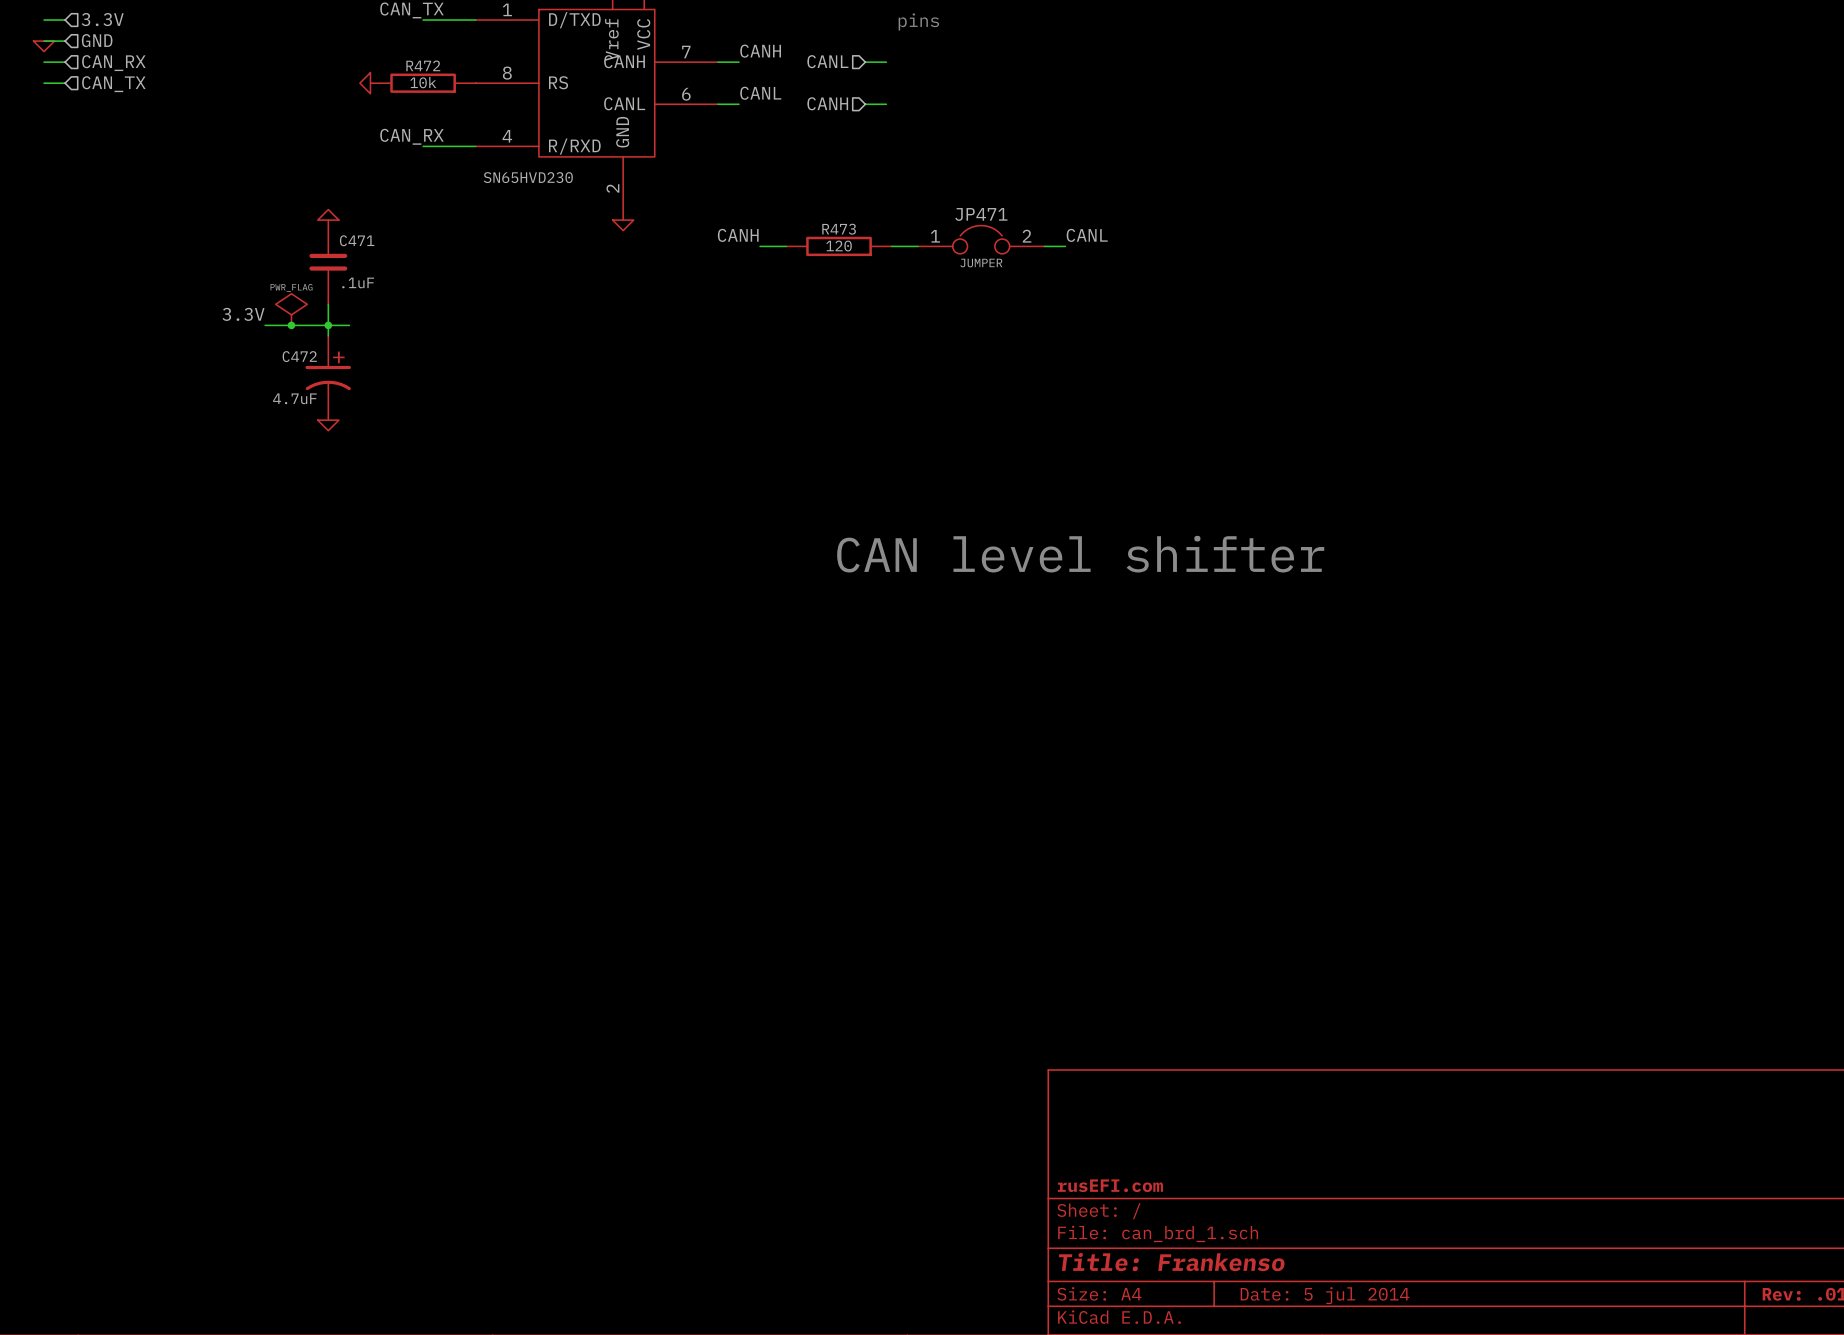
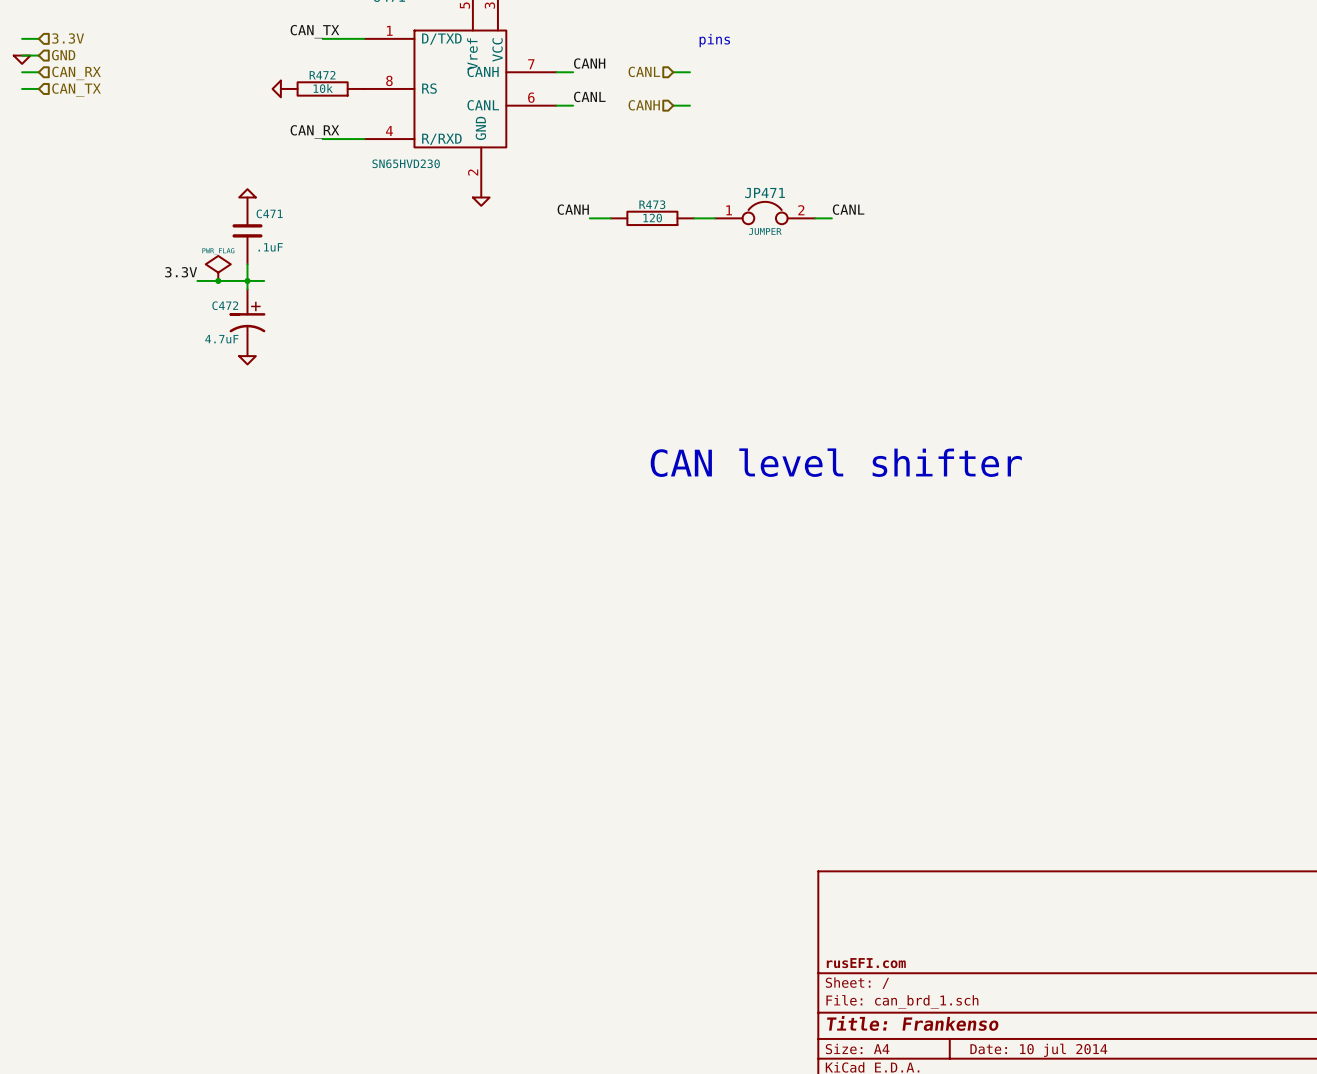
title block: Date: 5 jul 2014 (1325, 1295) -> Date: 10 jul 2014 (1038, 1050)

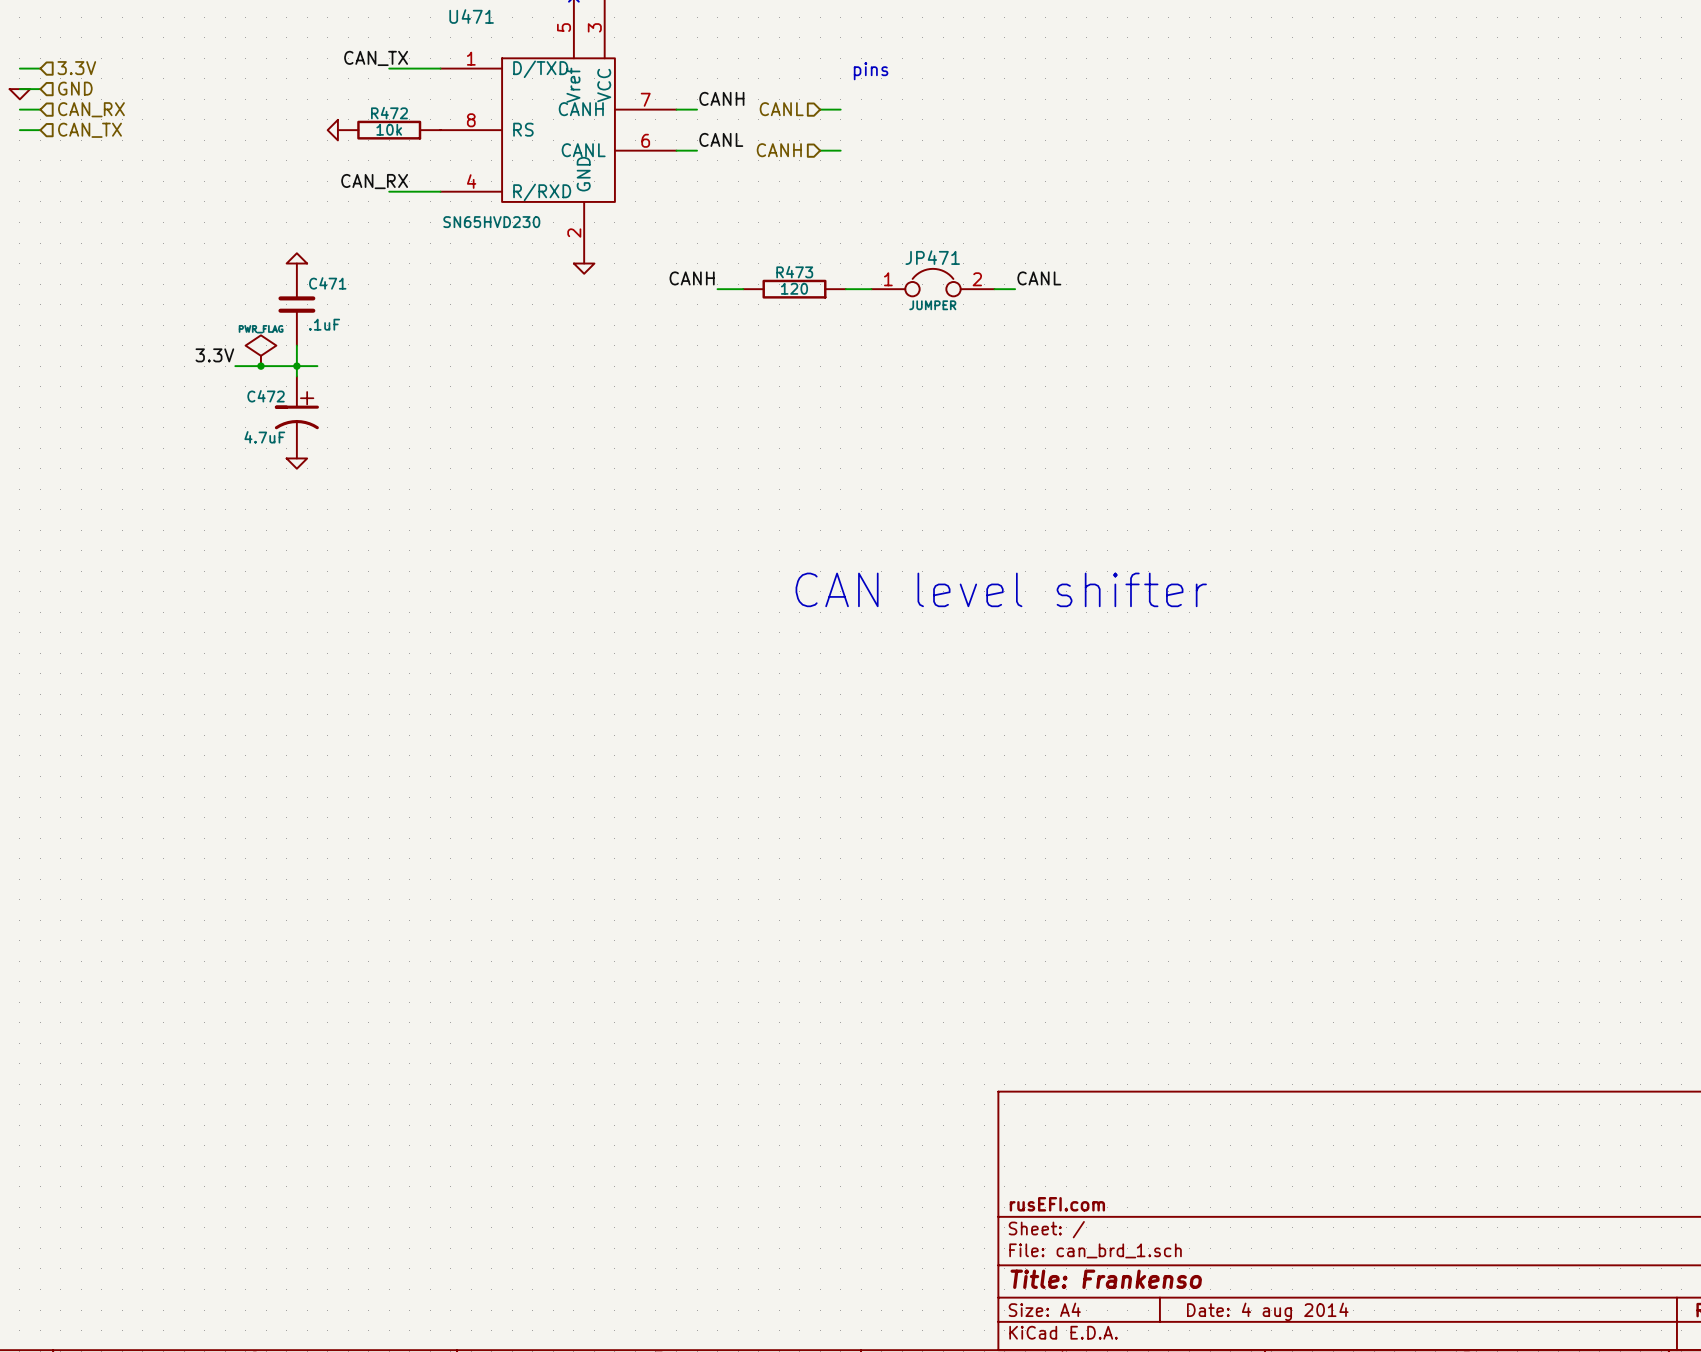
title block: Date: 10 jul 2014 (1038, 1050) -> Date: 4 aug 2014 (1267, 1311)

